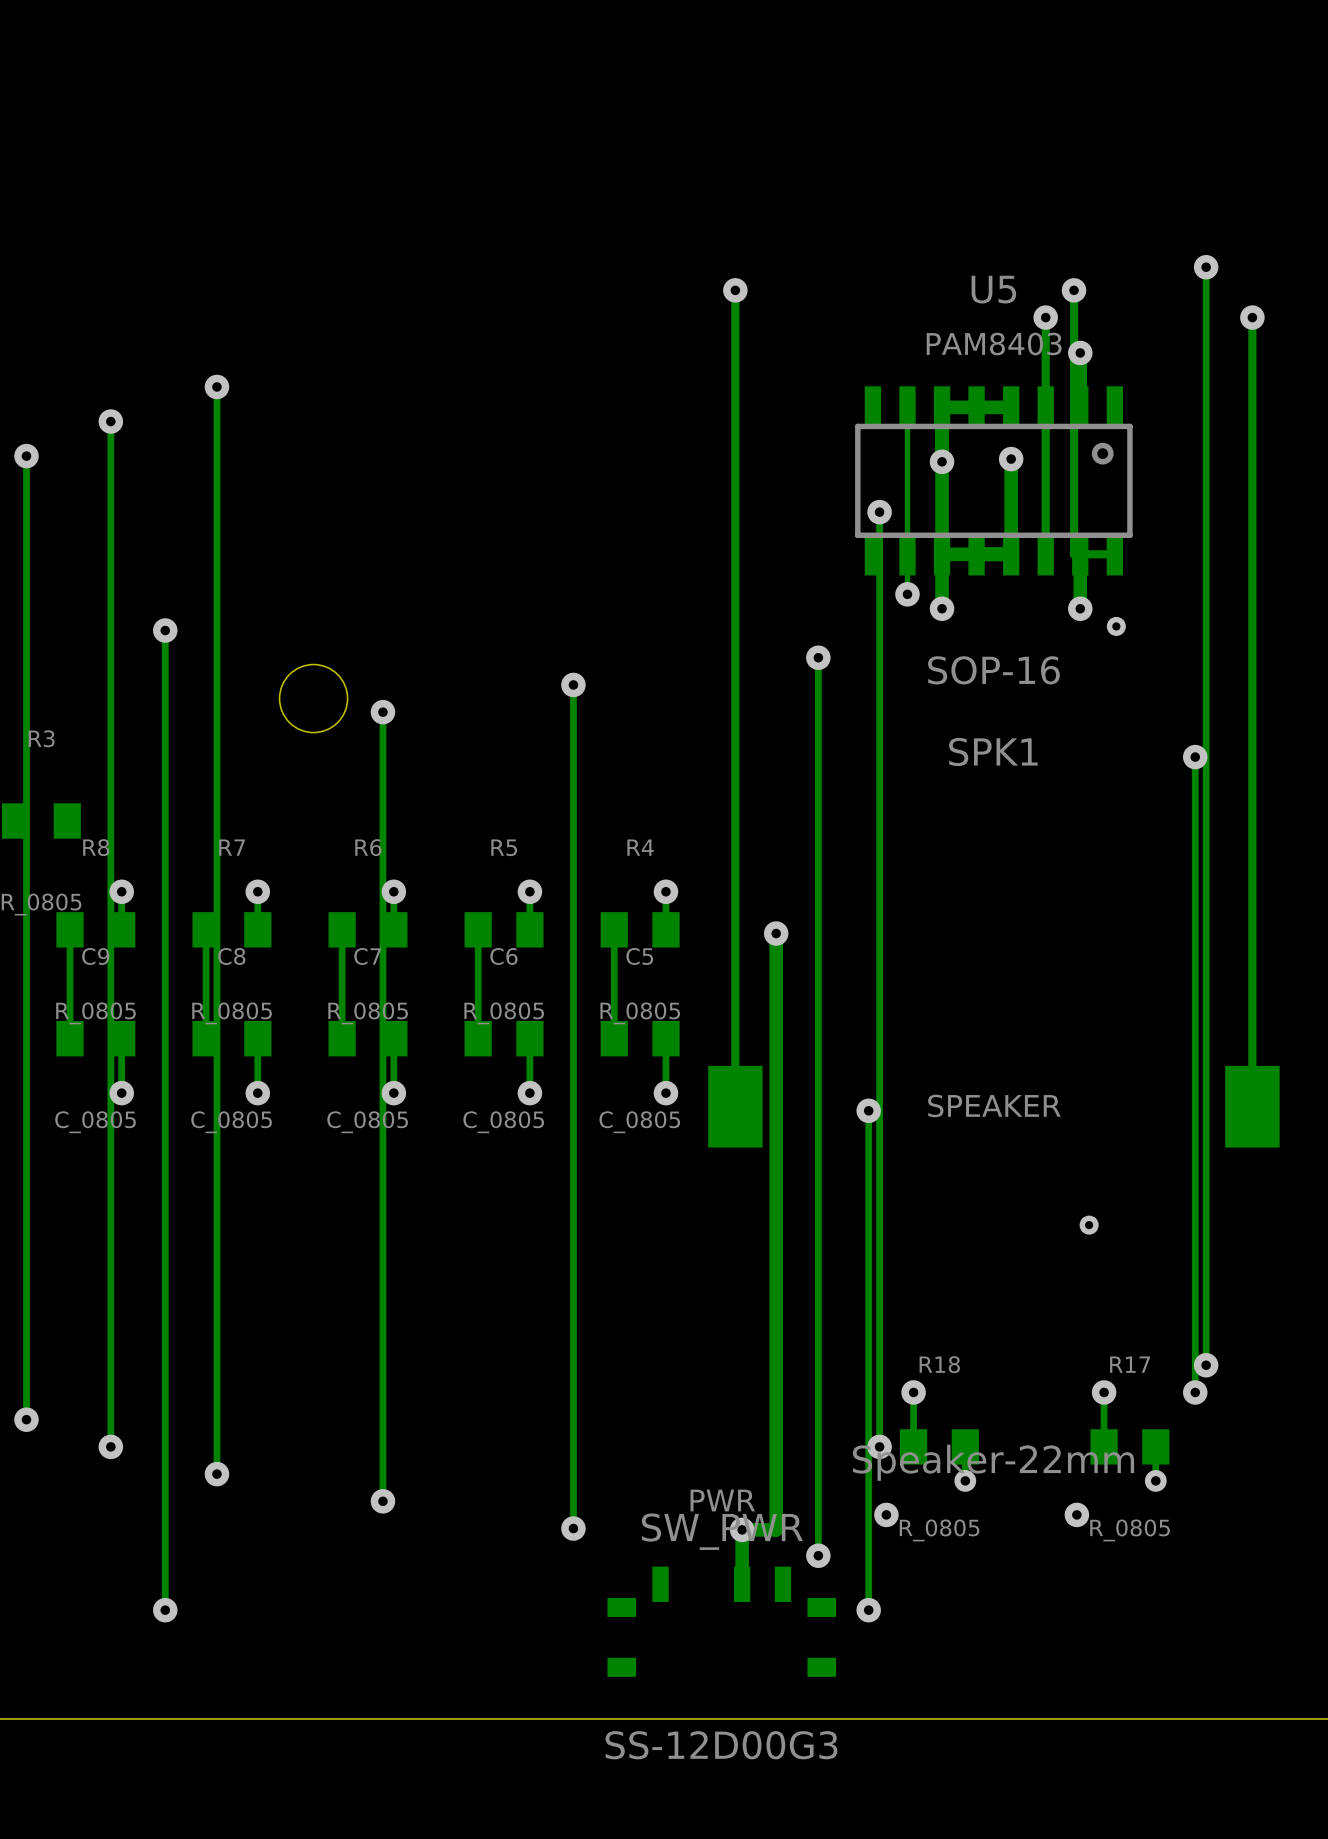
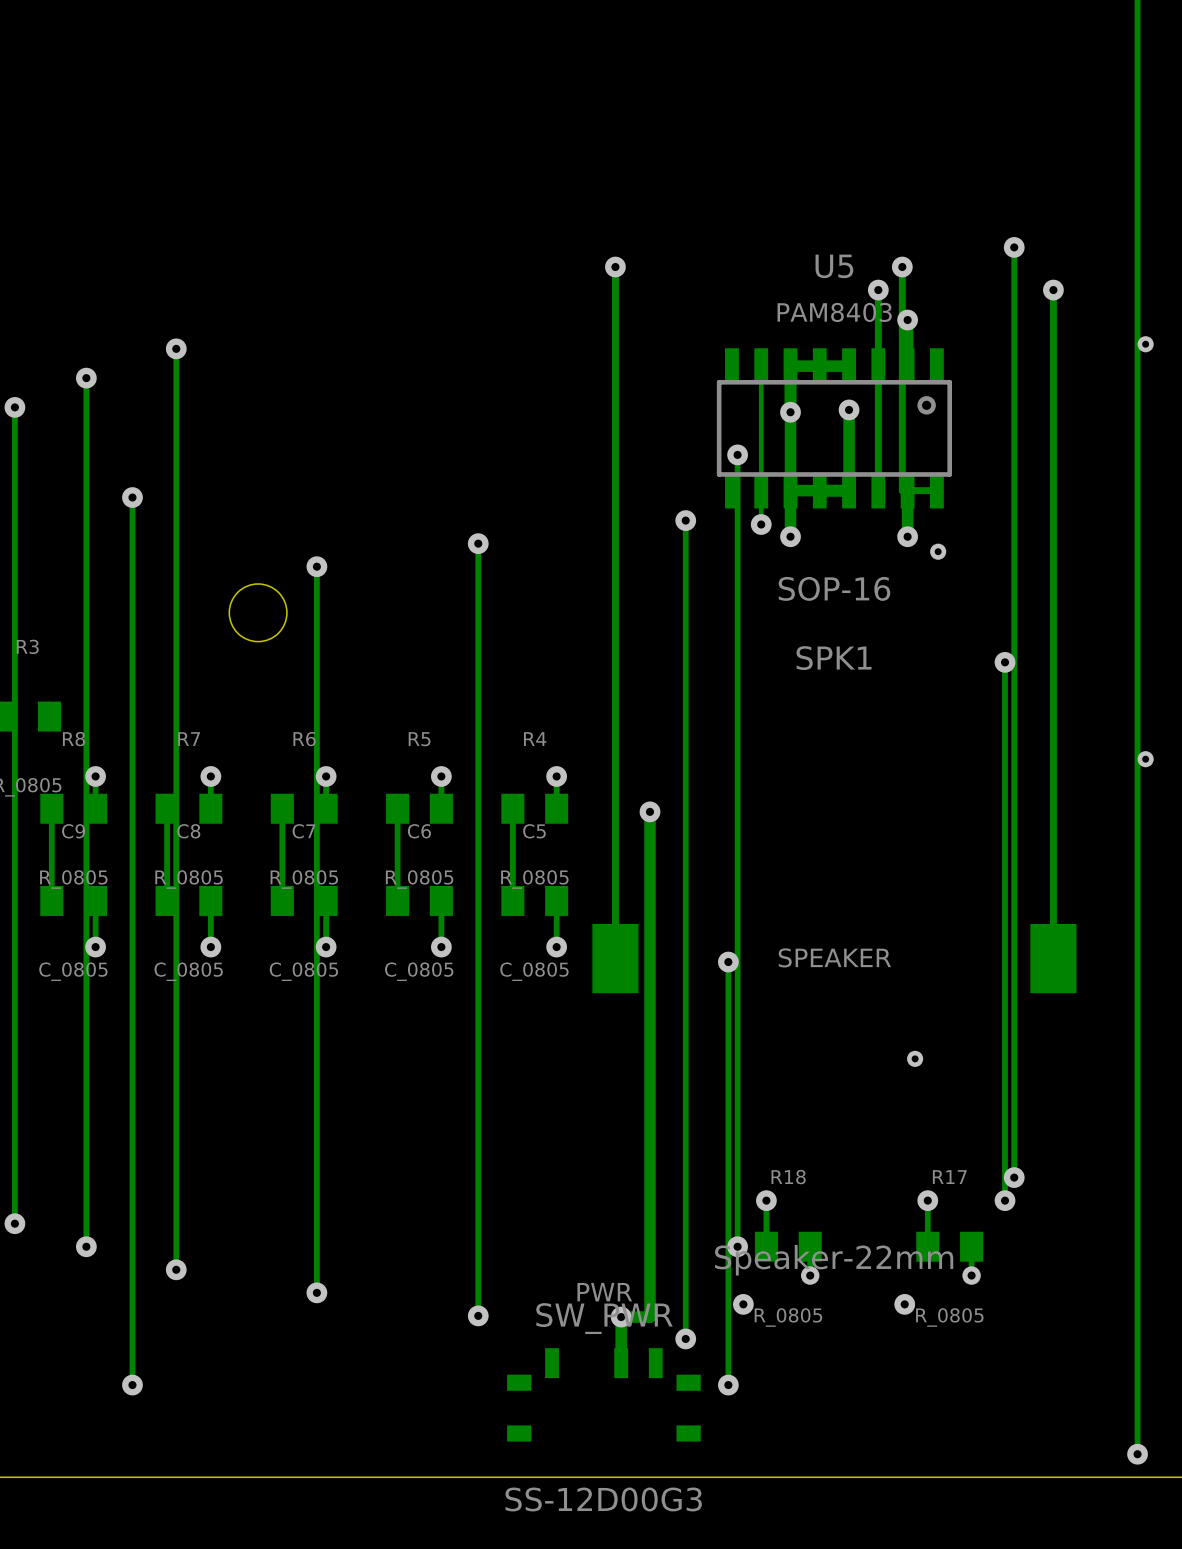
track: none -> (132, 497) (132, 555)
track: none -> (685, 520) (685, 578)
track: none -> (478, 543) (478, 601)
via position: (165, 630) -> (132, 497)
track: none -> (316, 566) (316, 624)
via position: (818, 657) -> (685, 520)
via position: (573, 684) -> (478, 543)
via position: (382, 712) -> (316, 566)

